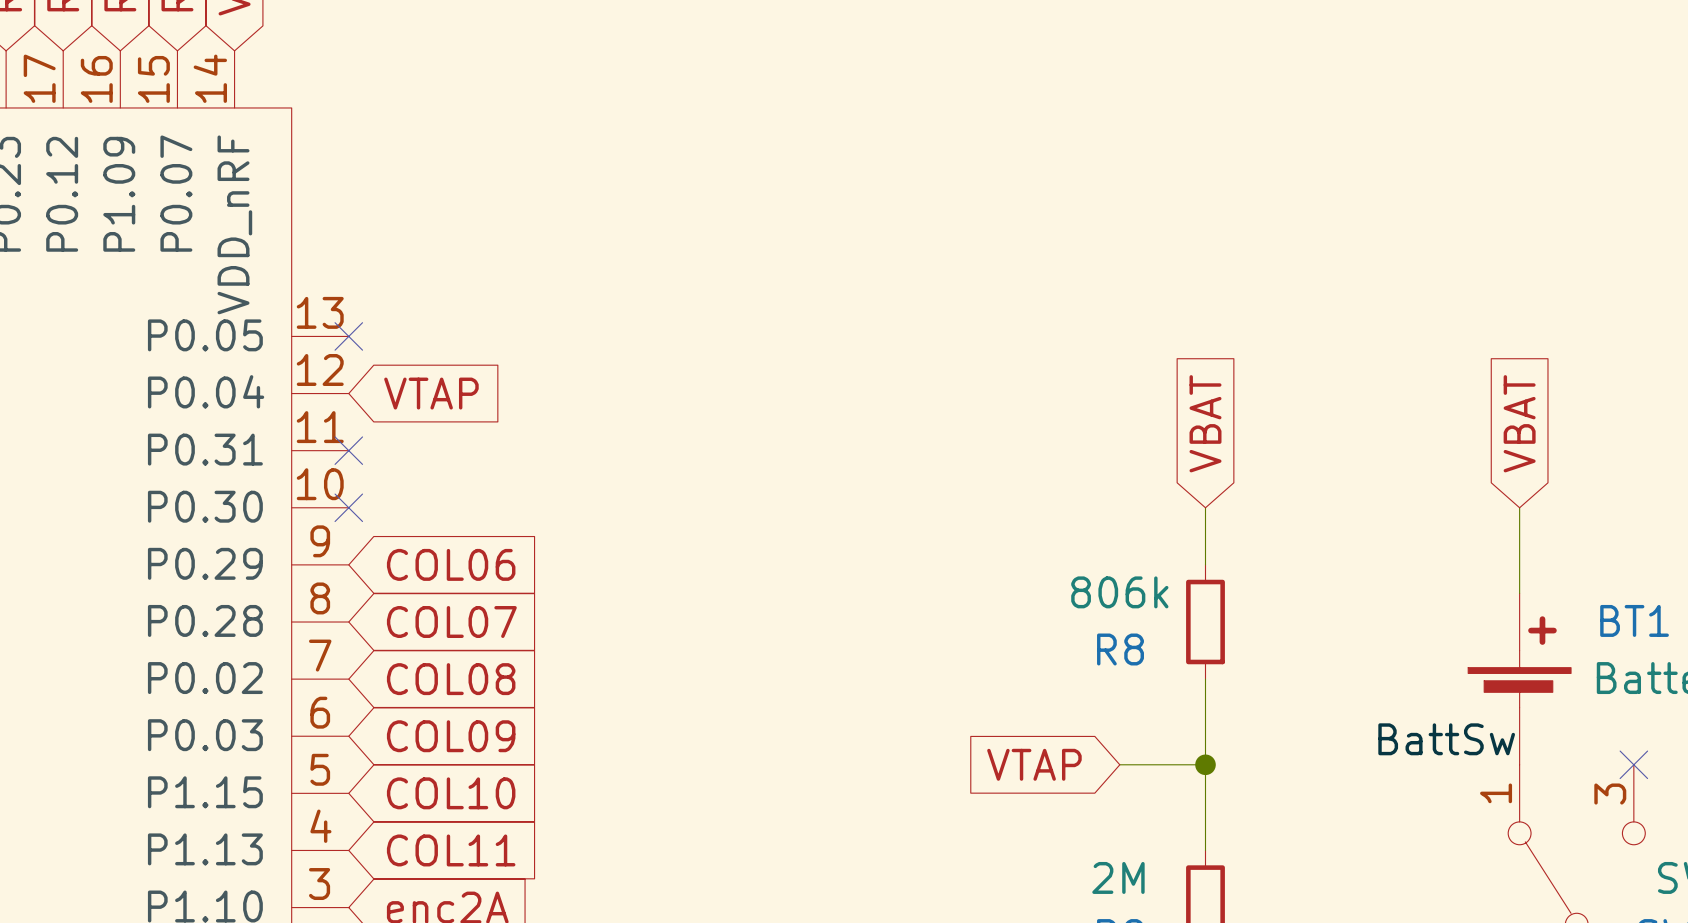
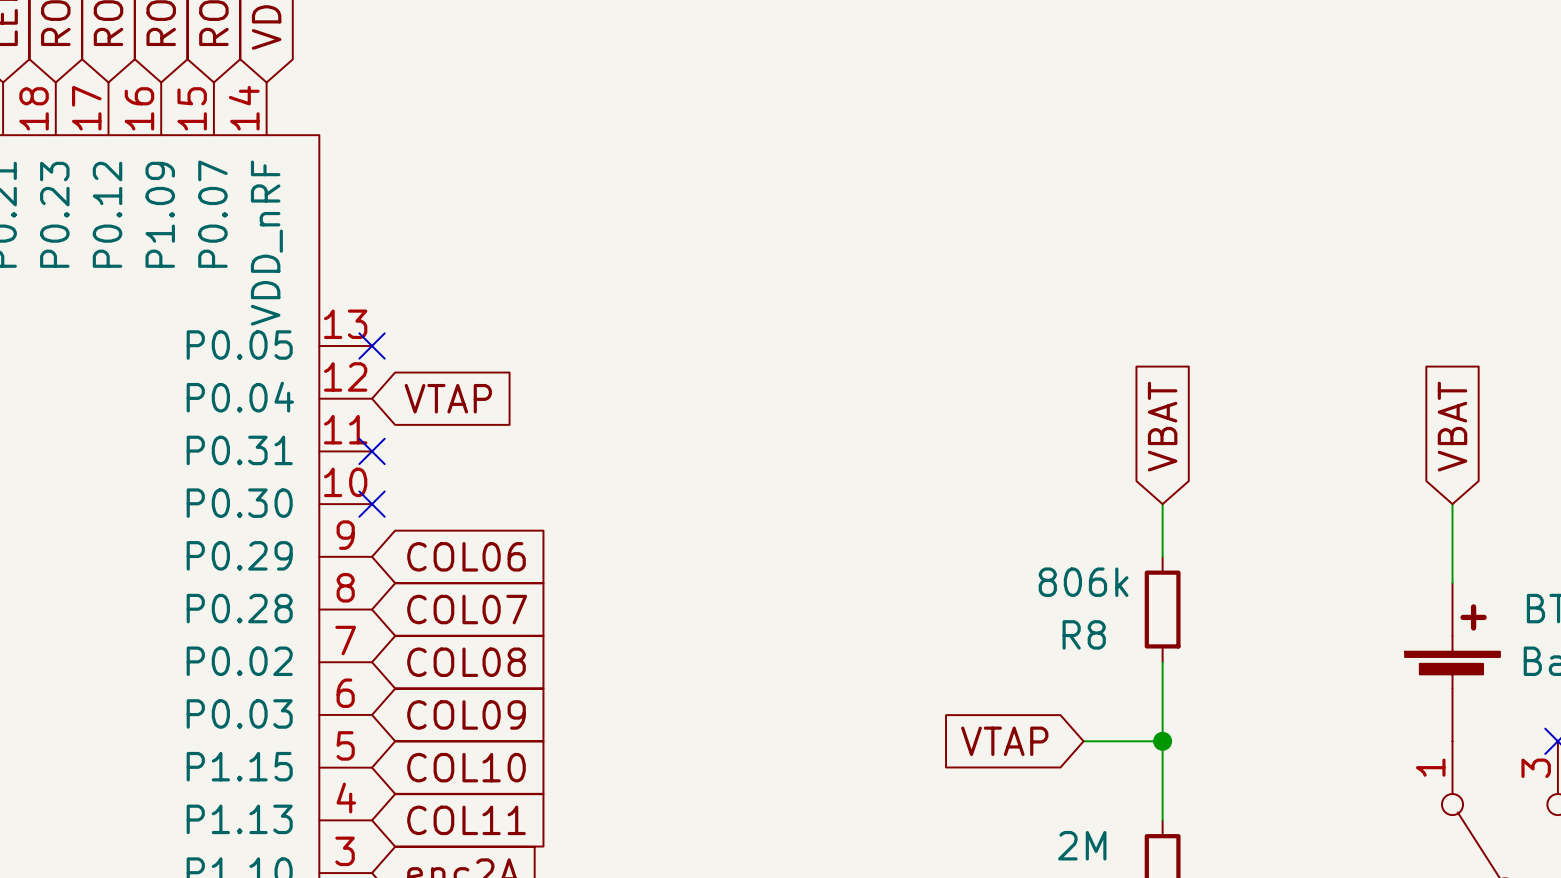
label: BattSw (1446, 739) -> none

